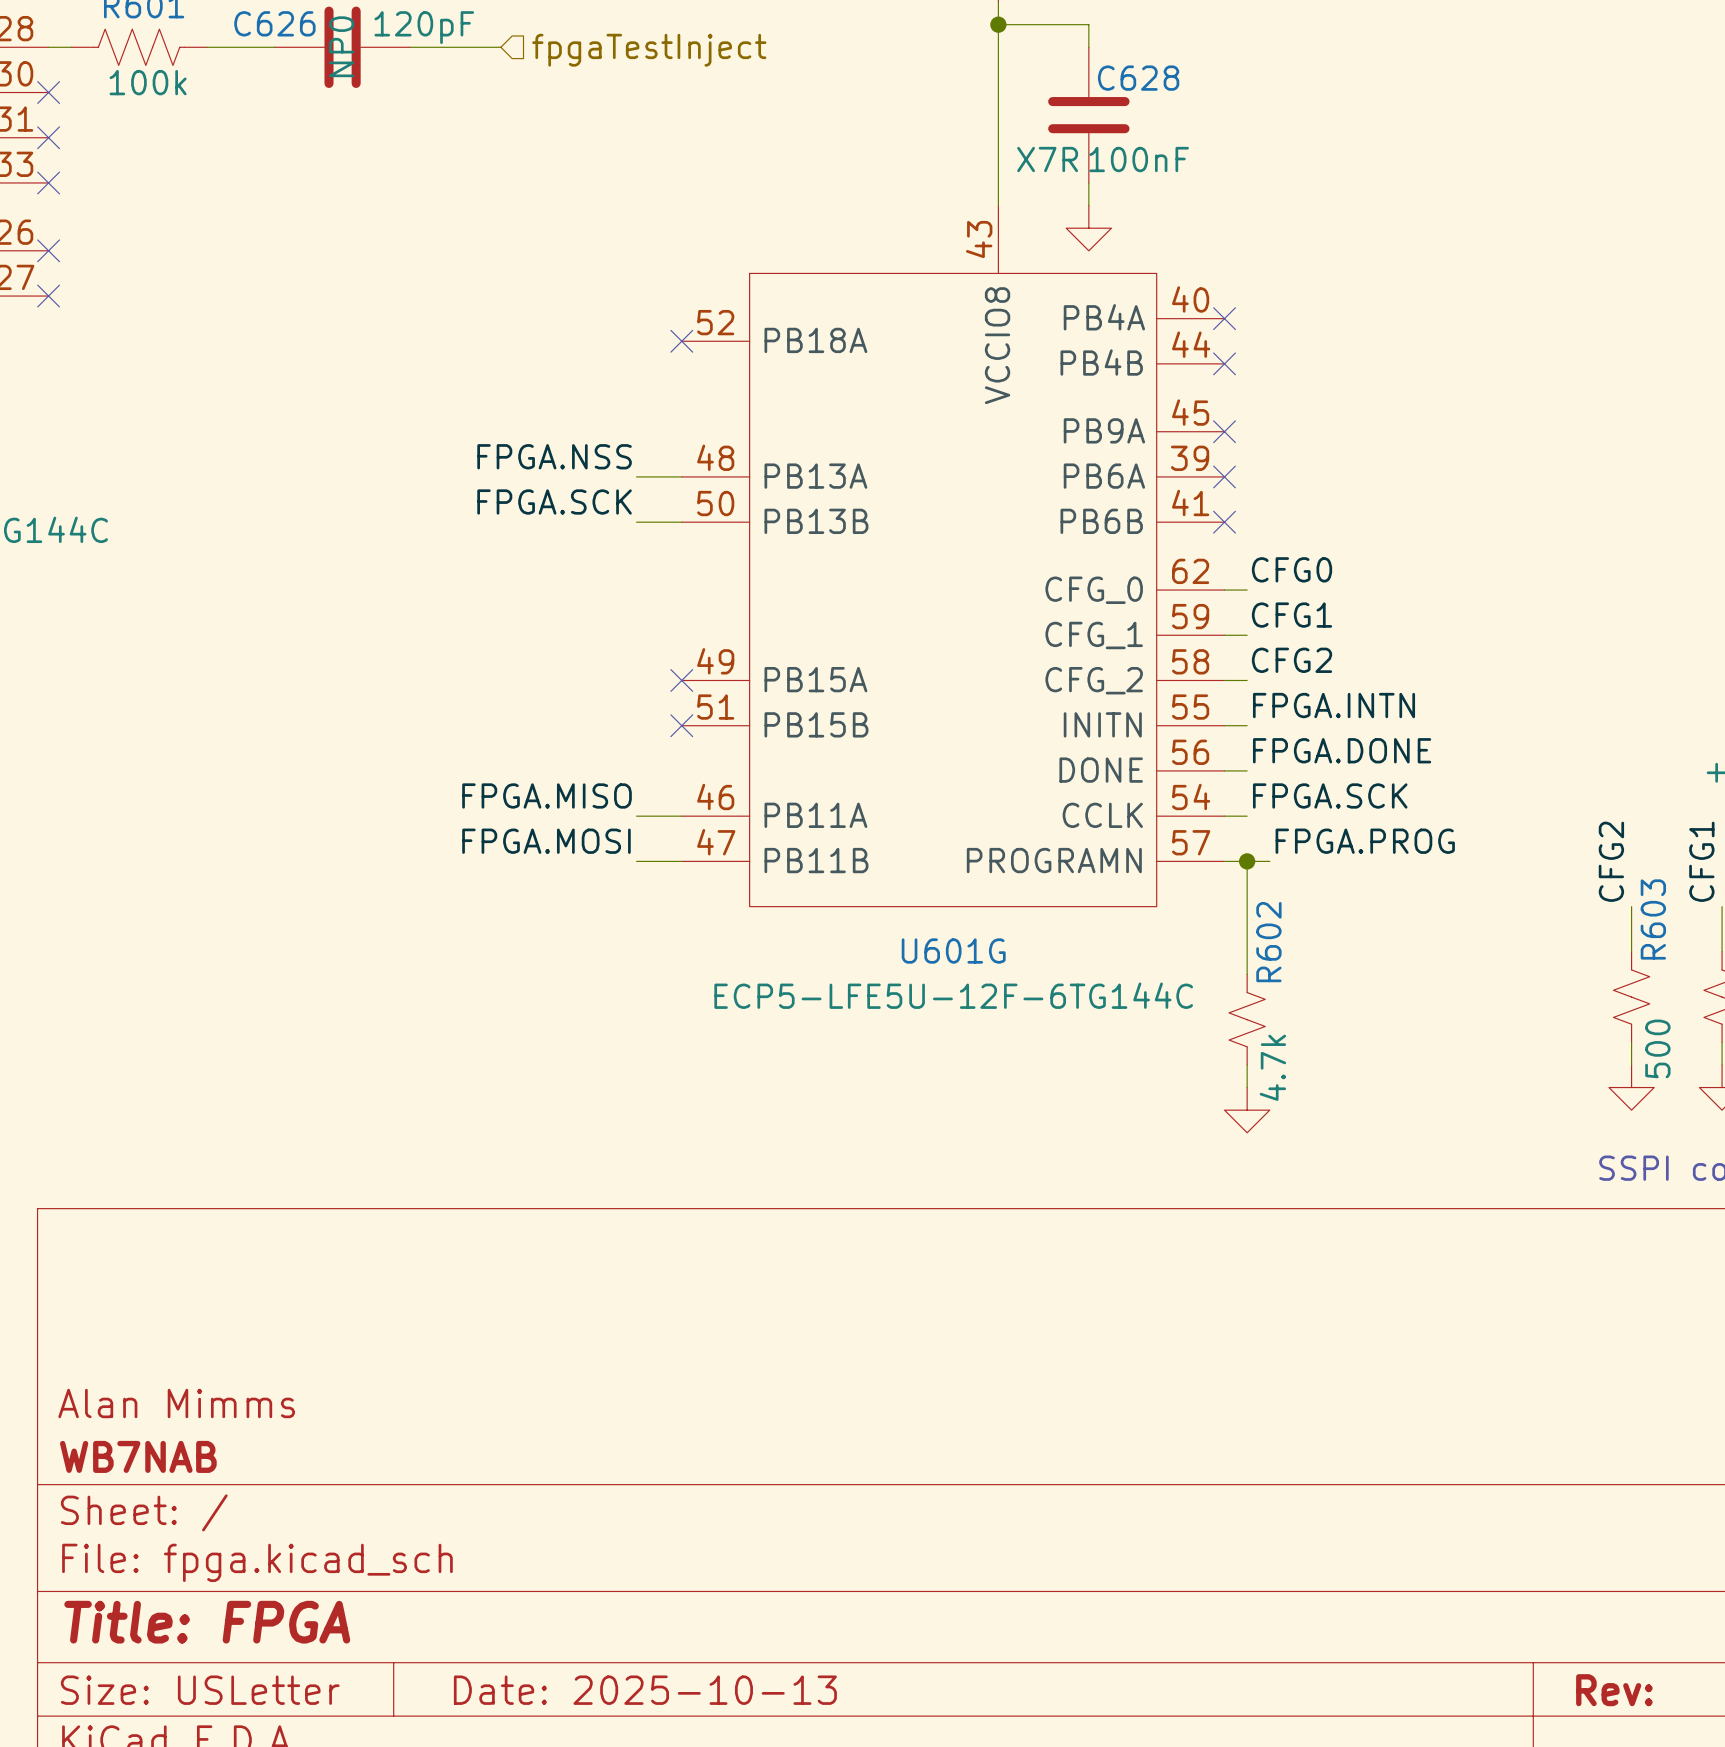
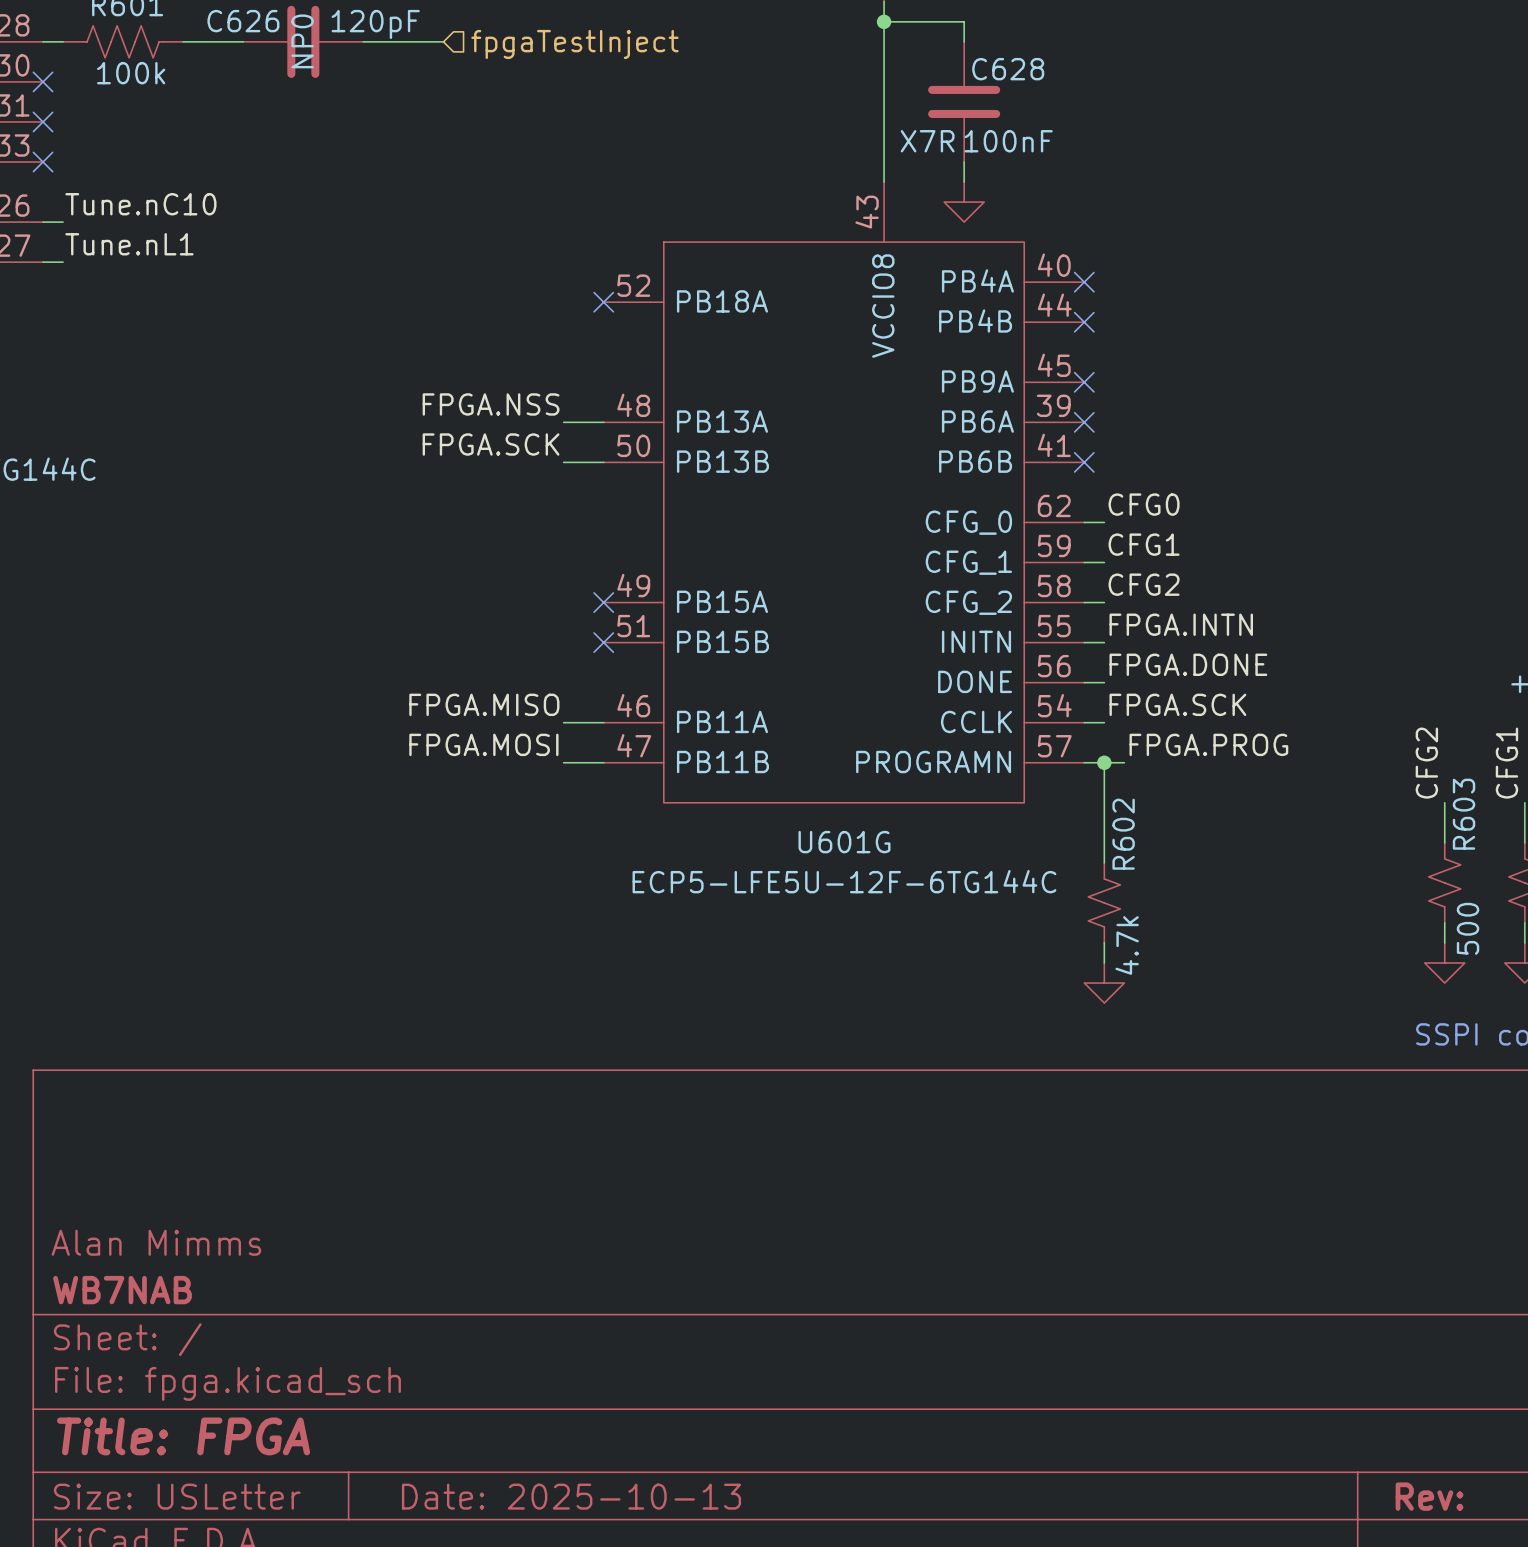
label: none -> Tune.nC10 (140, 204)
wire: none -> (43, 222) (63, 222)
no-connect mark: (48, 250) -> none
label: none -> Tune.nL1 (129, 244)
wire: none -> (43, 262) (63, 262)
no-connect mark: (48, 296) -> none

